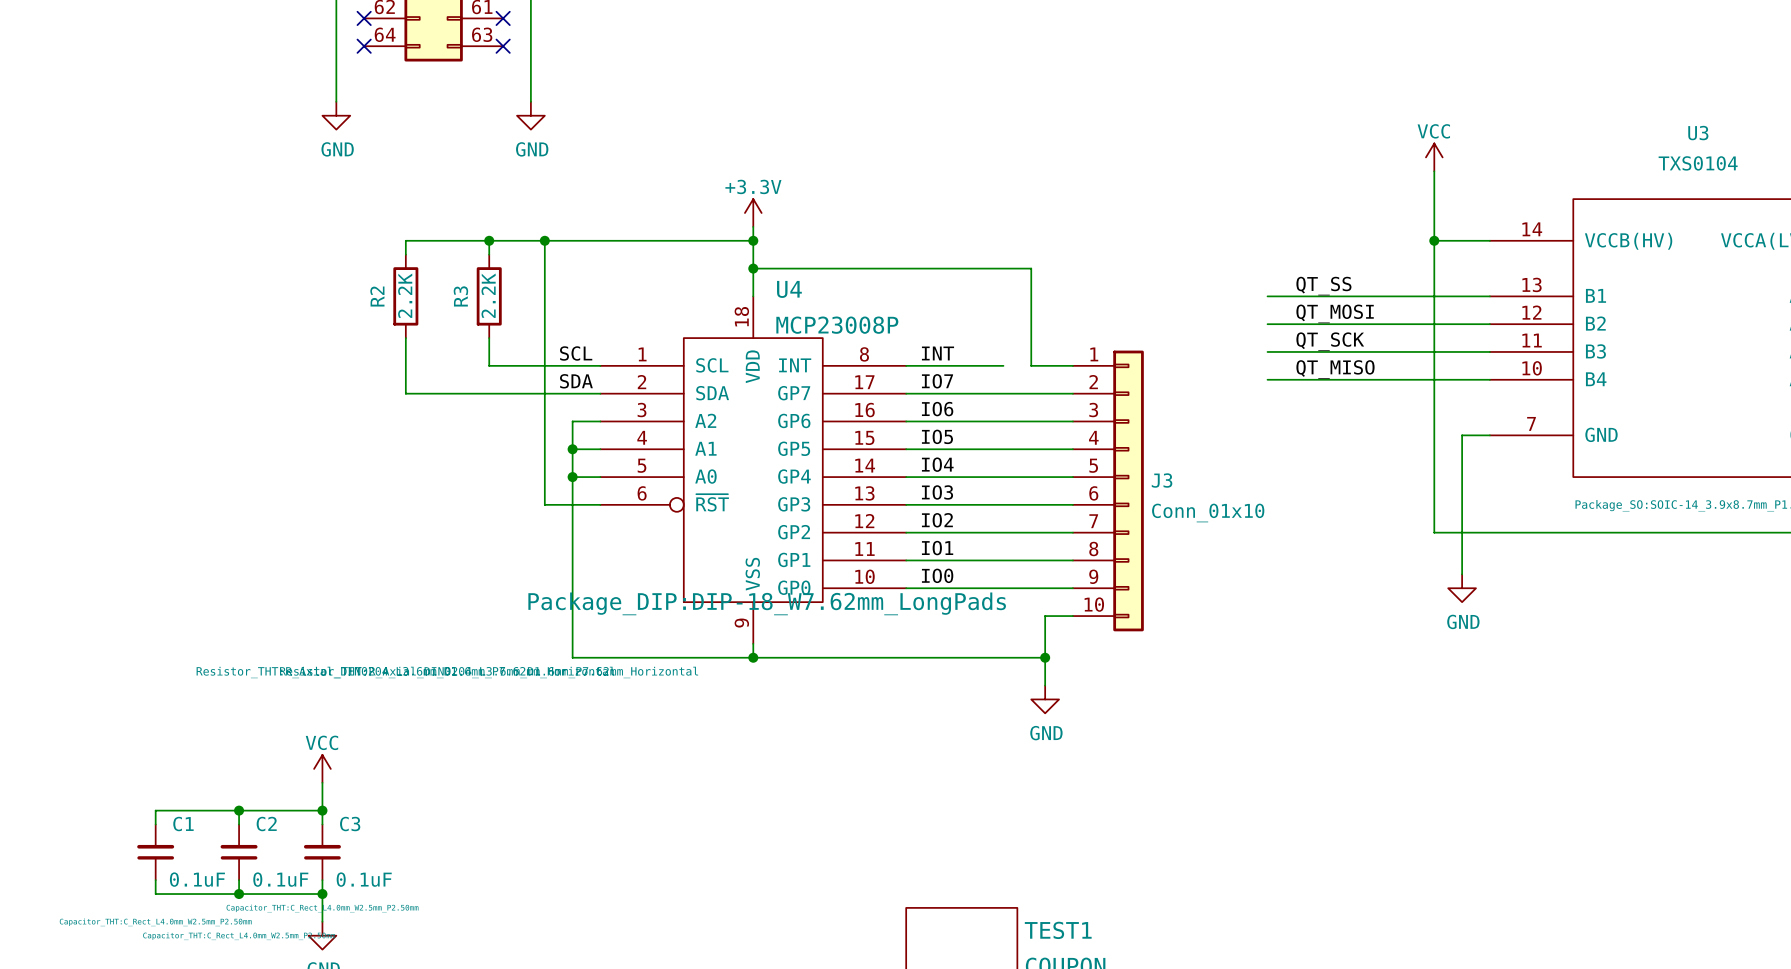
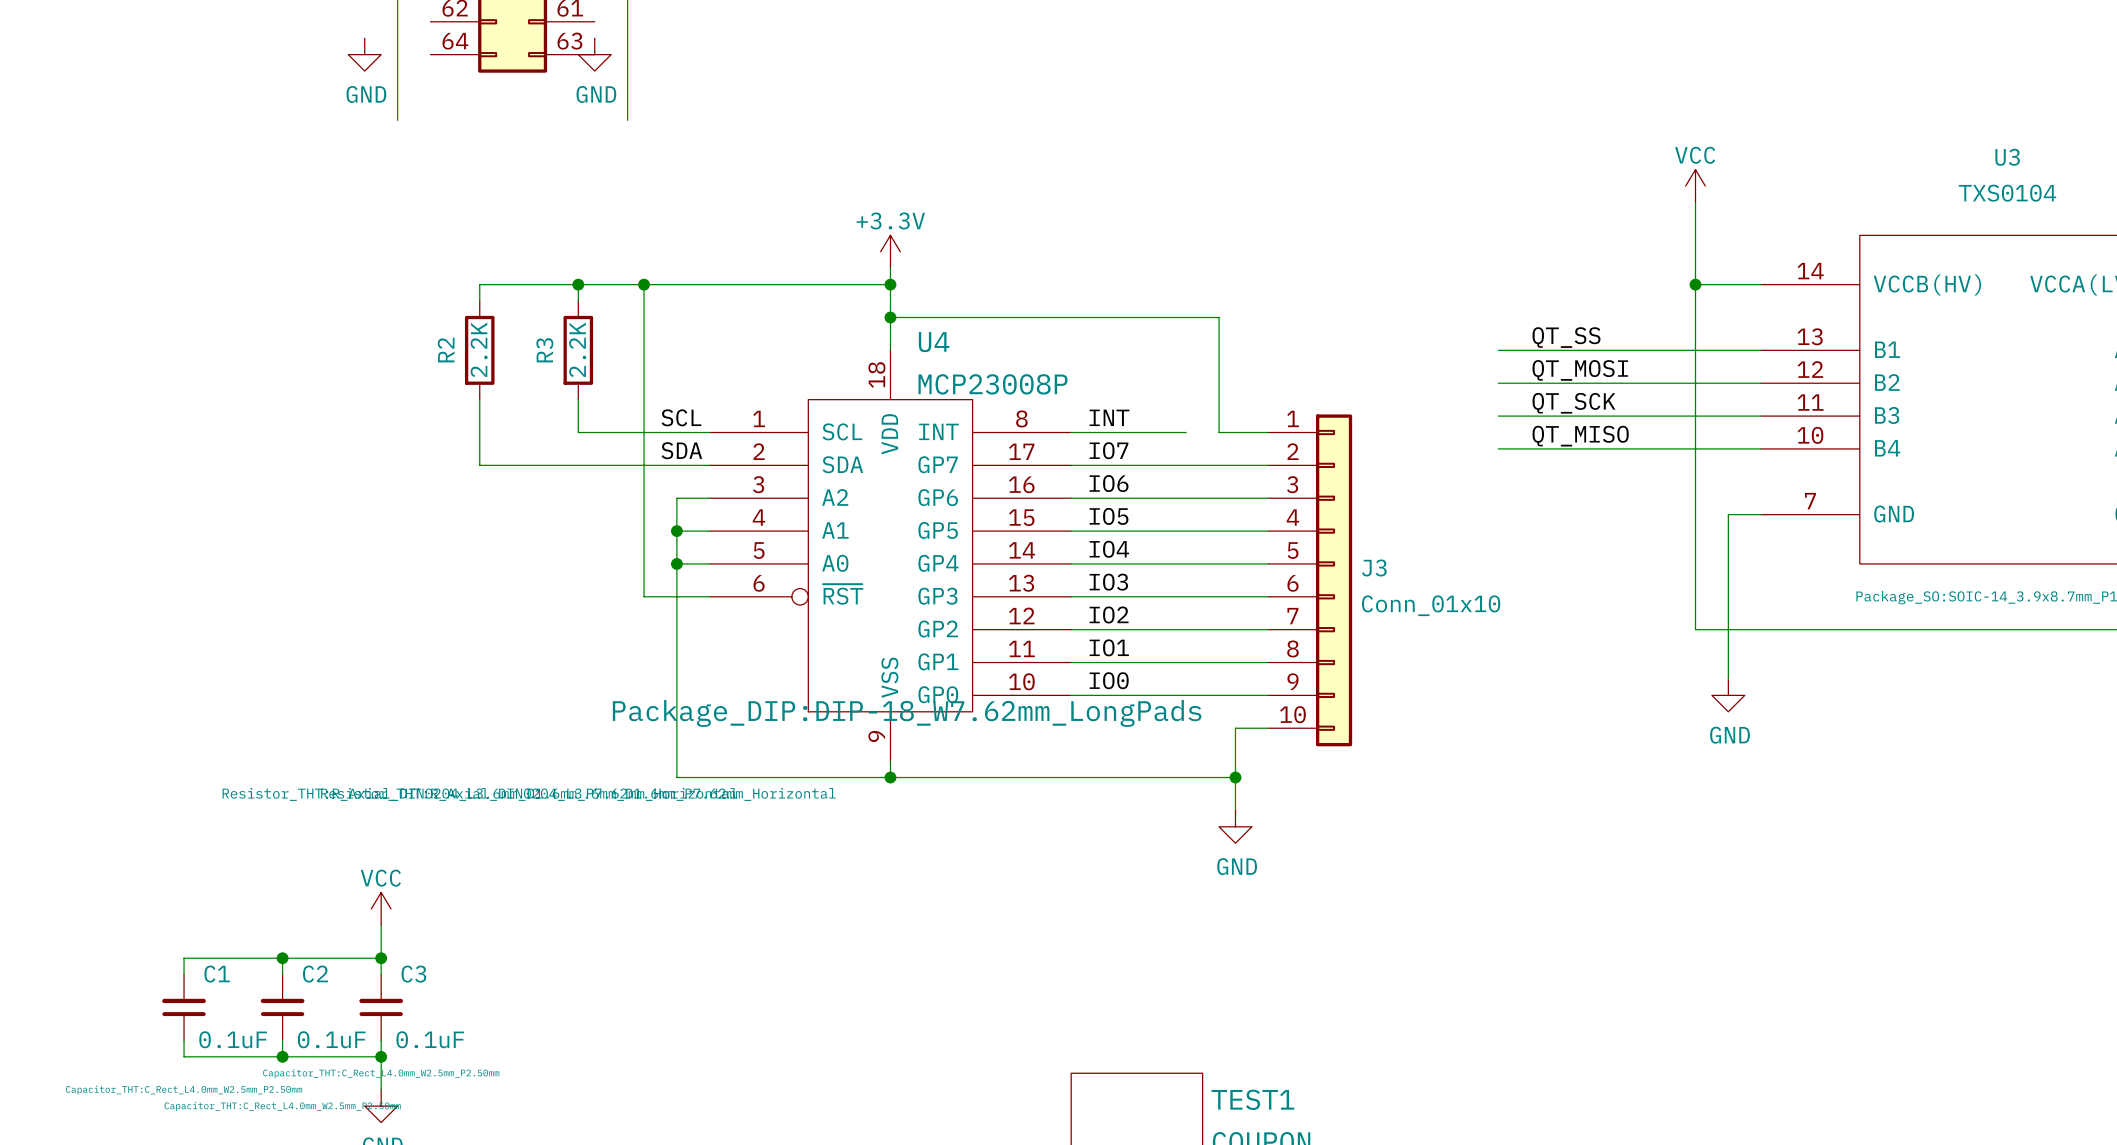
no-connect mark: (364, 18) -> none
no-connect mark: (503, 18) -> none
no-connect mark: (364, 46) -> none
no-connect mark: (503, 46) -> none
power symbol position: GND (336, 115) -> GND (364, 54)
power symbol position: GND (530, 115) -> GND (594, 54)

